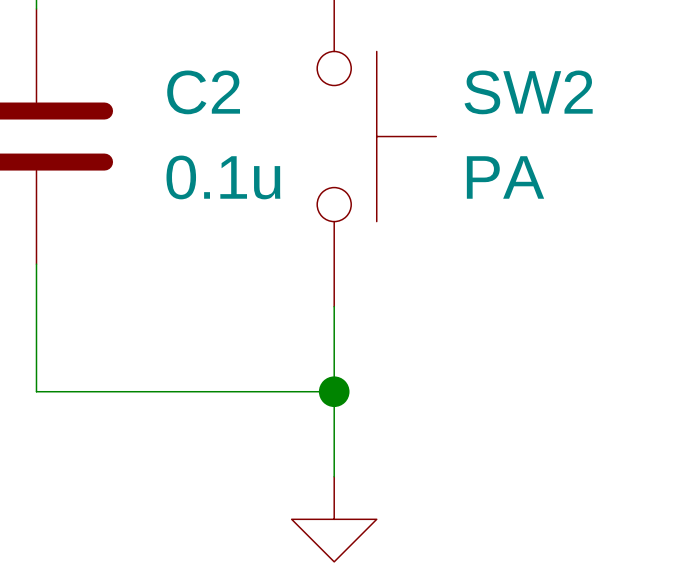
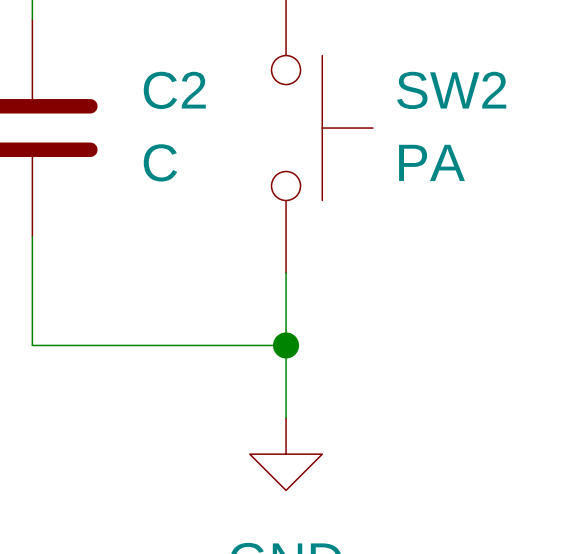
C2 value: 0.1u (223, 177) -> C (160, 162)

